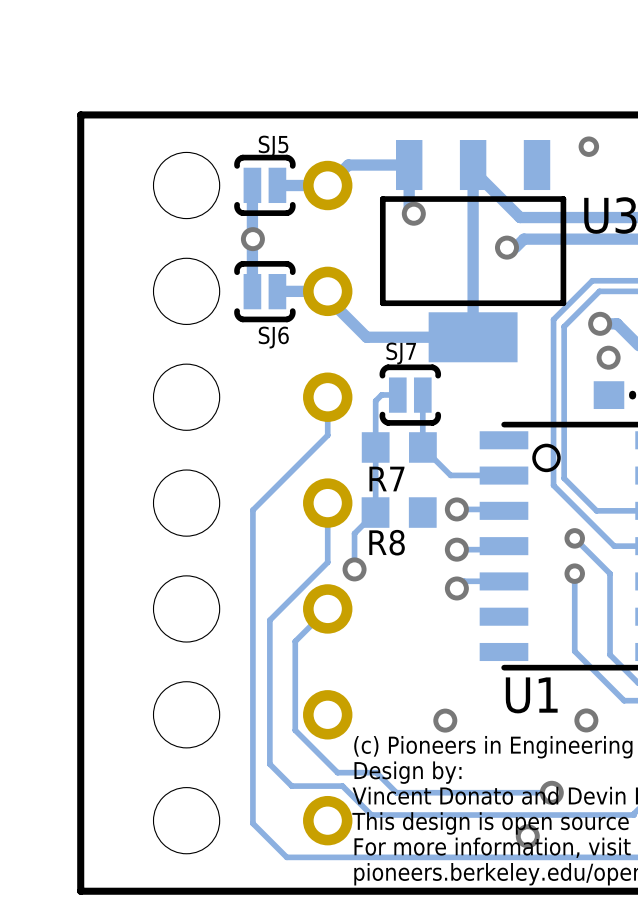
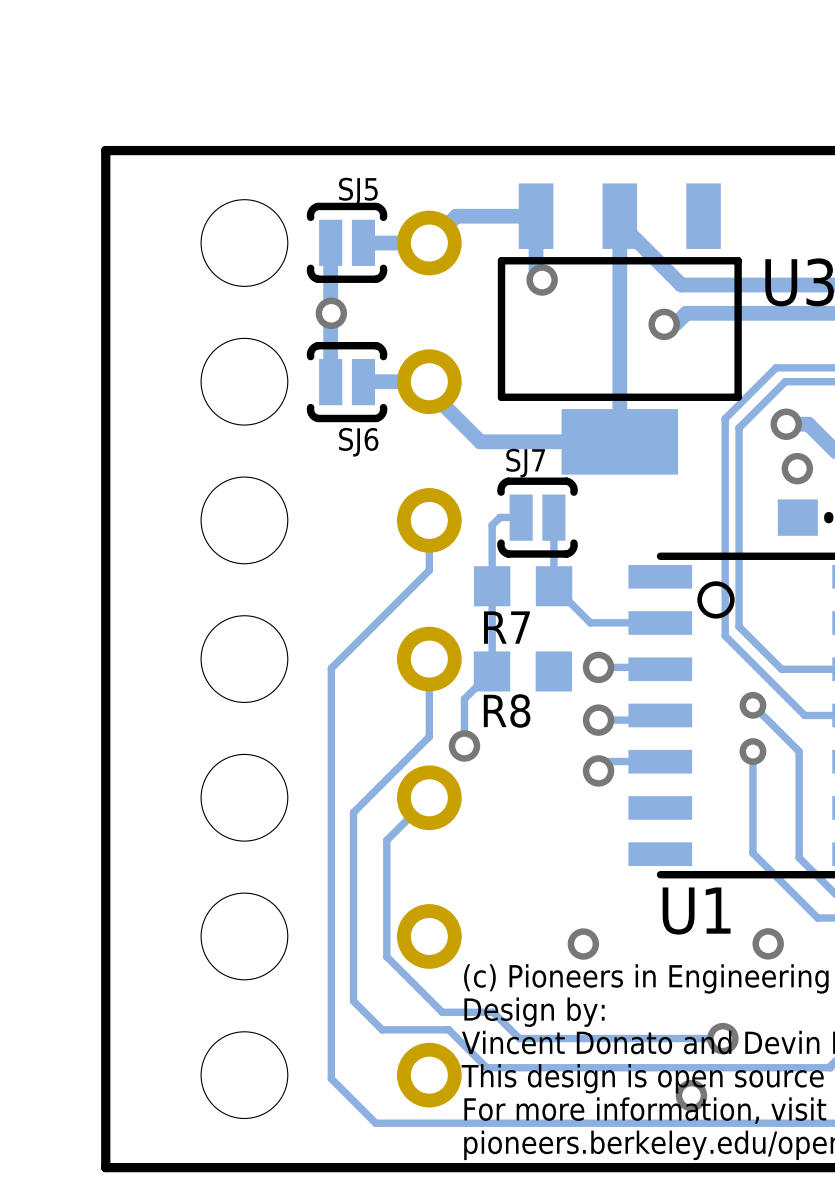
via: (588, 146) -> none

